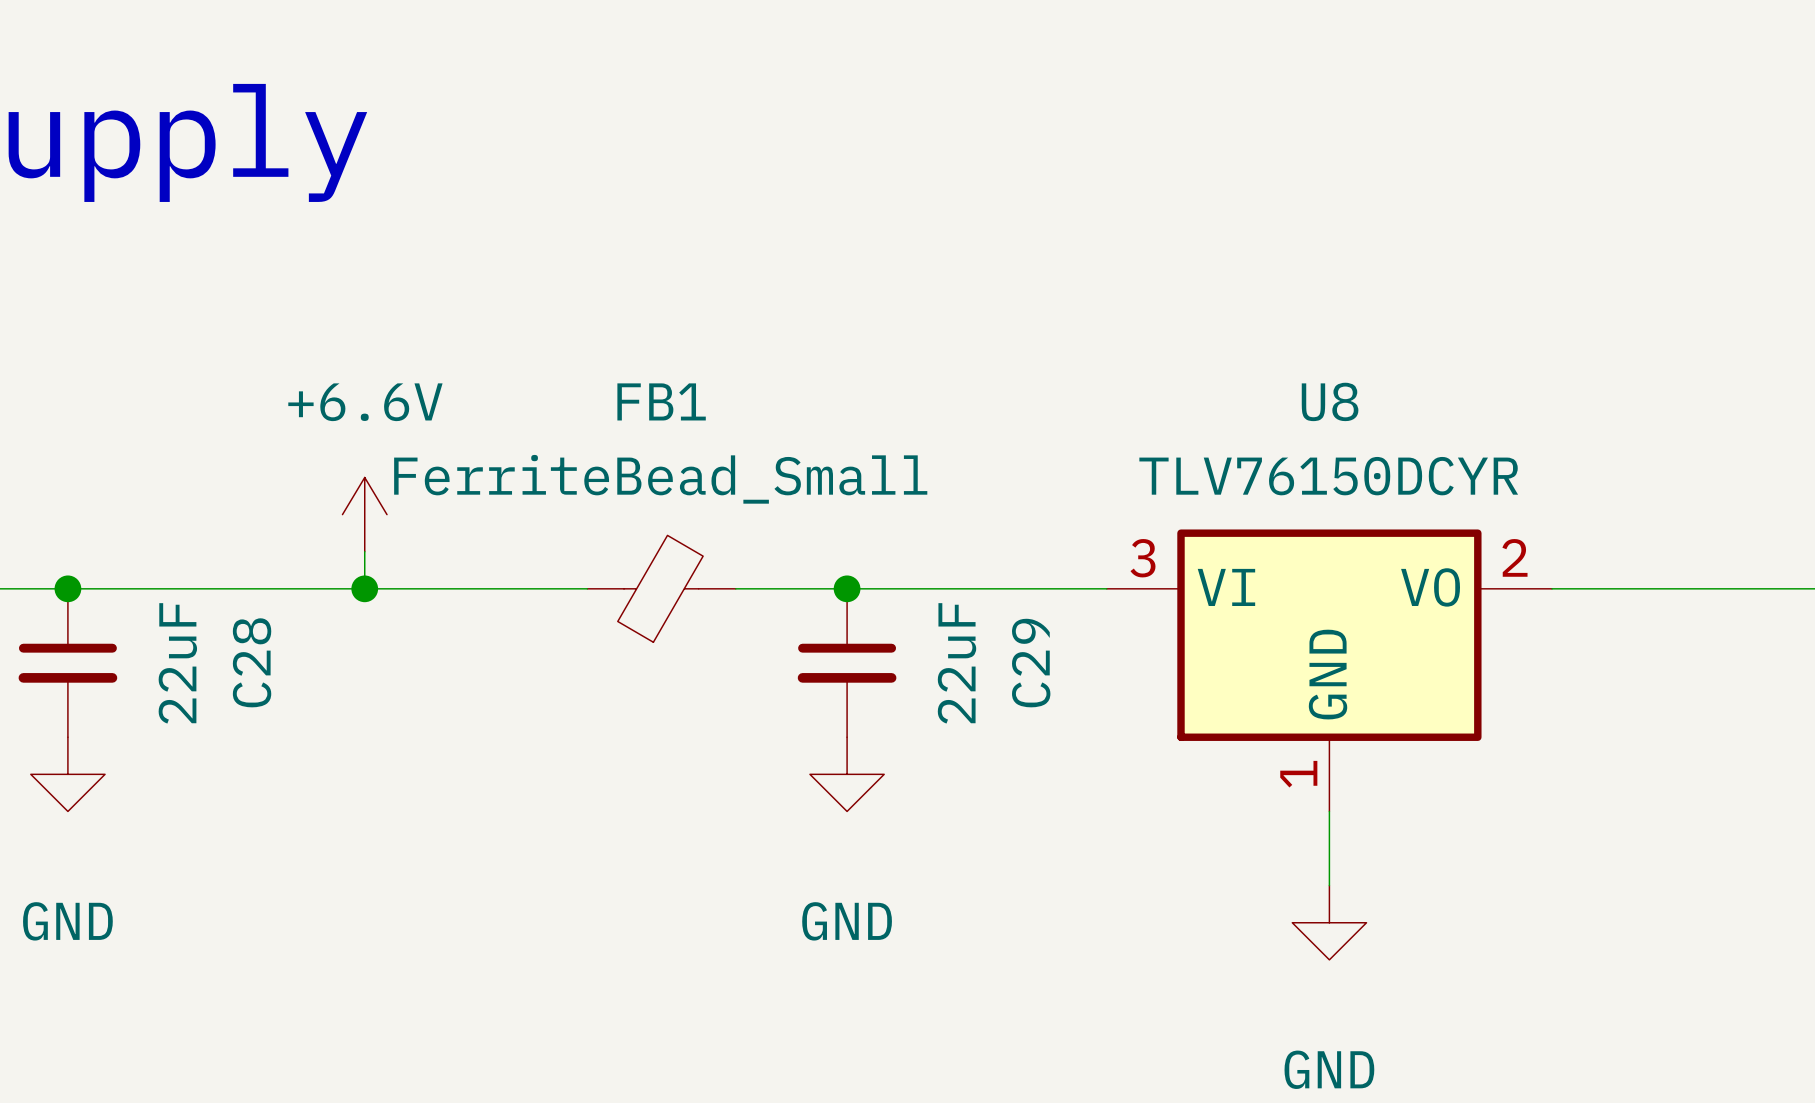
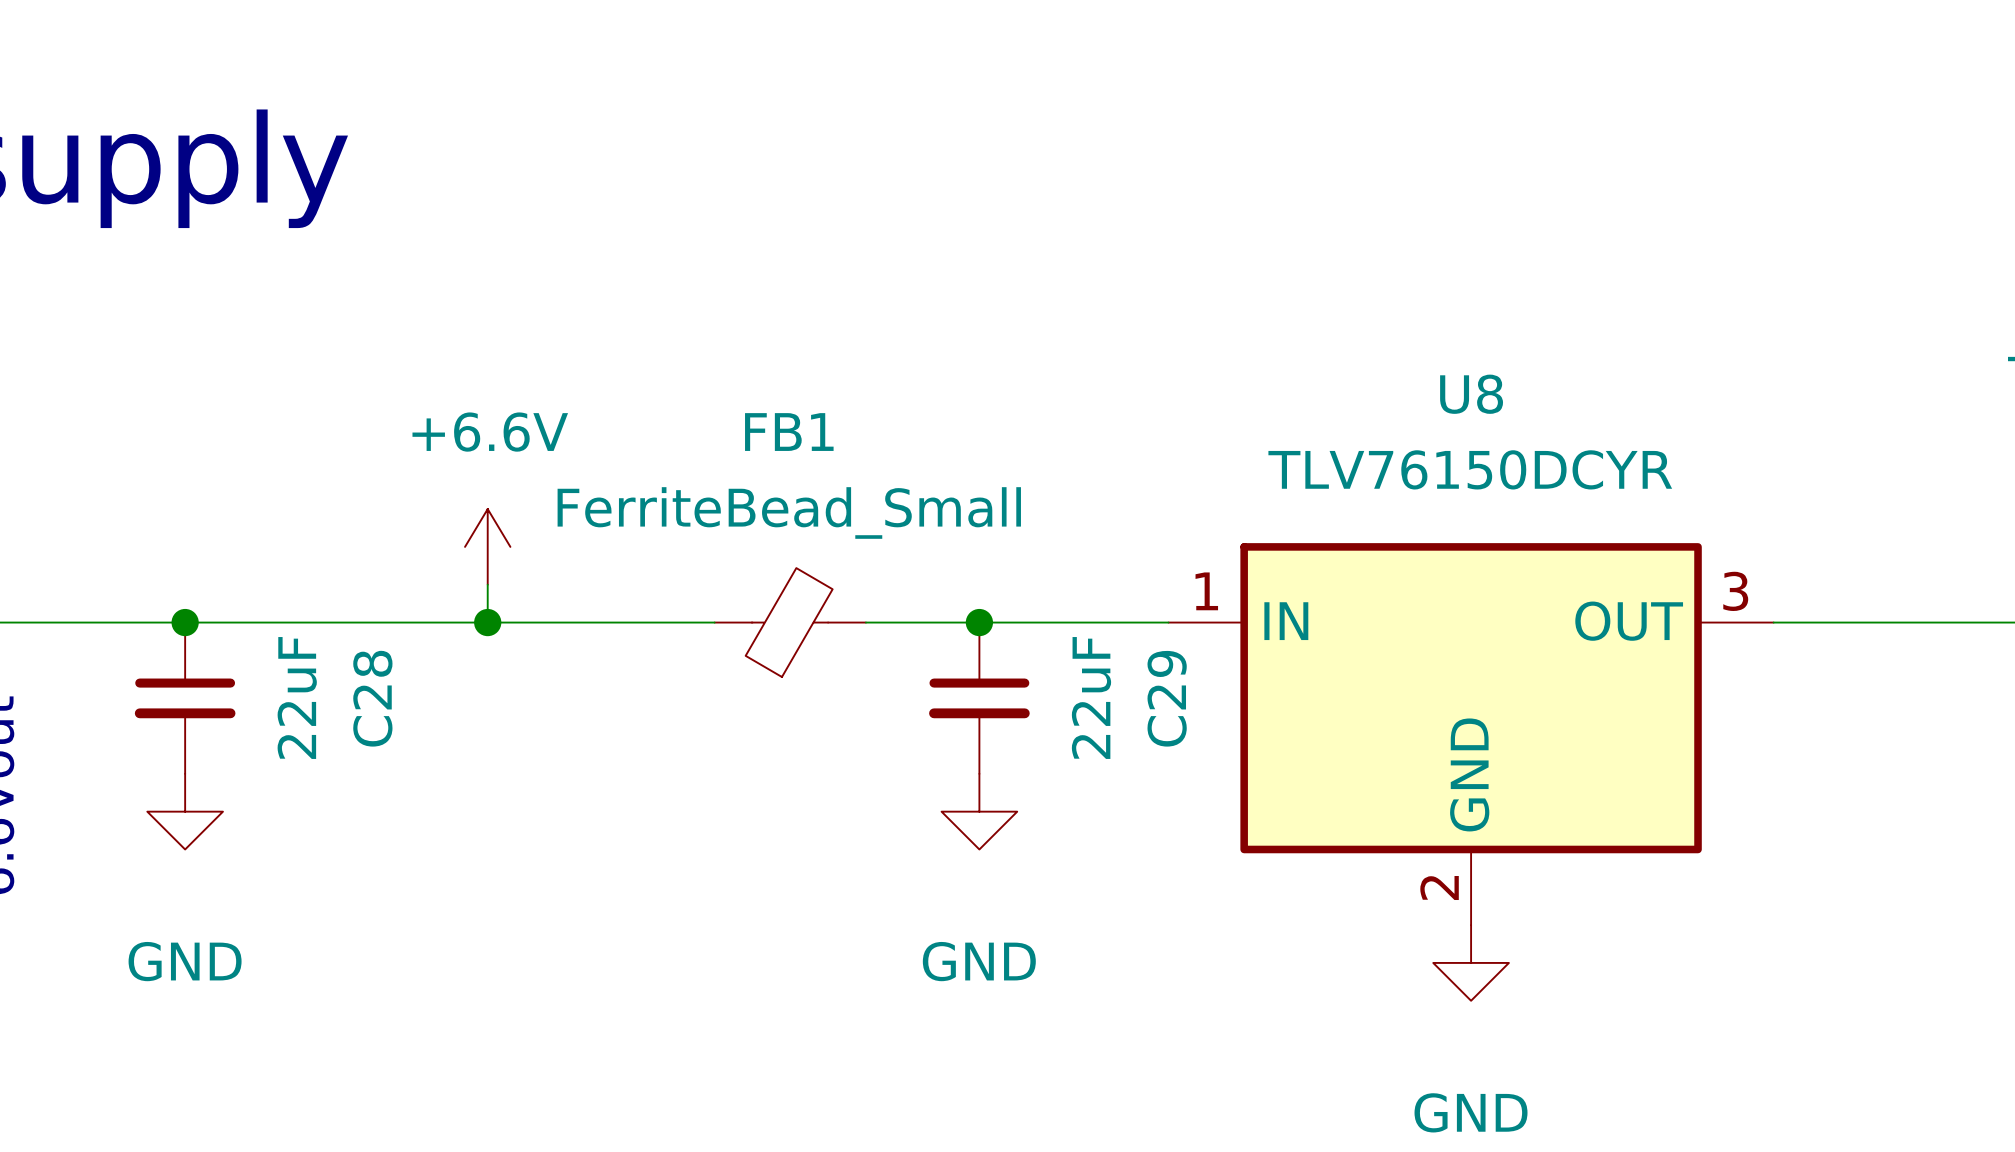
U8 name position: U8 (1330, 401) -> U8 (1471, 394)
U8 value position: TLV76150DCYR (1328, 476) -> TLV76150DCYR (1470, 469)
U8 symbol: [1106, 529, 1553, 812] -> [1168, 543, 1774, 926]

